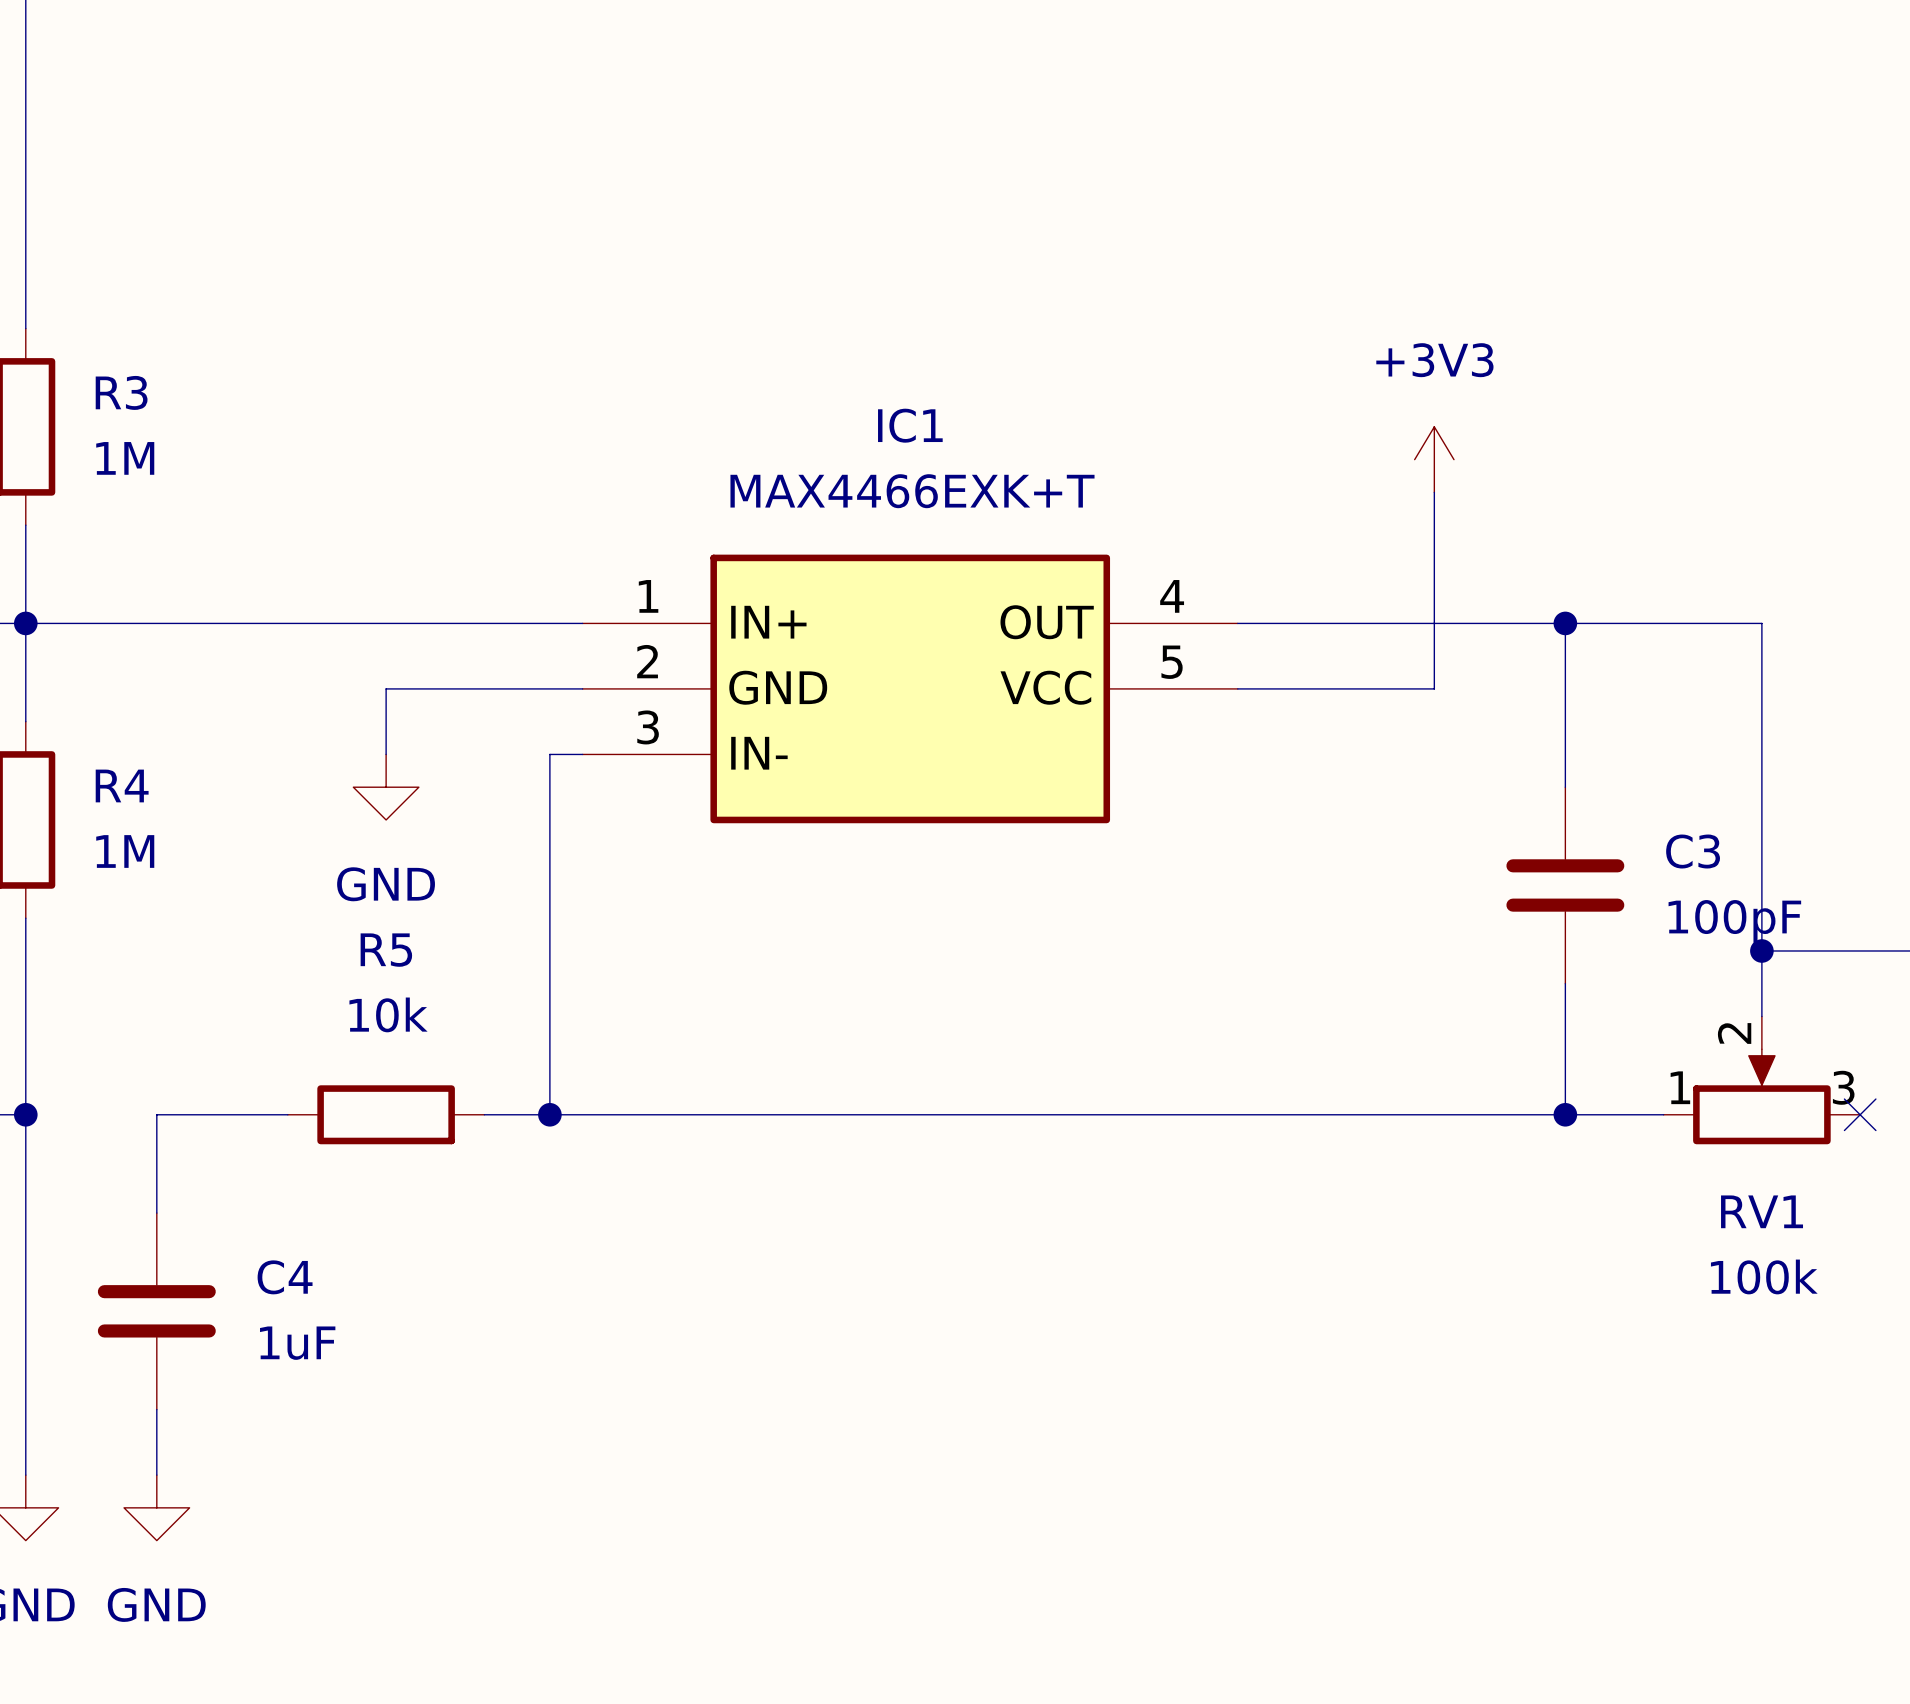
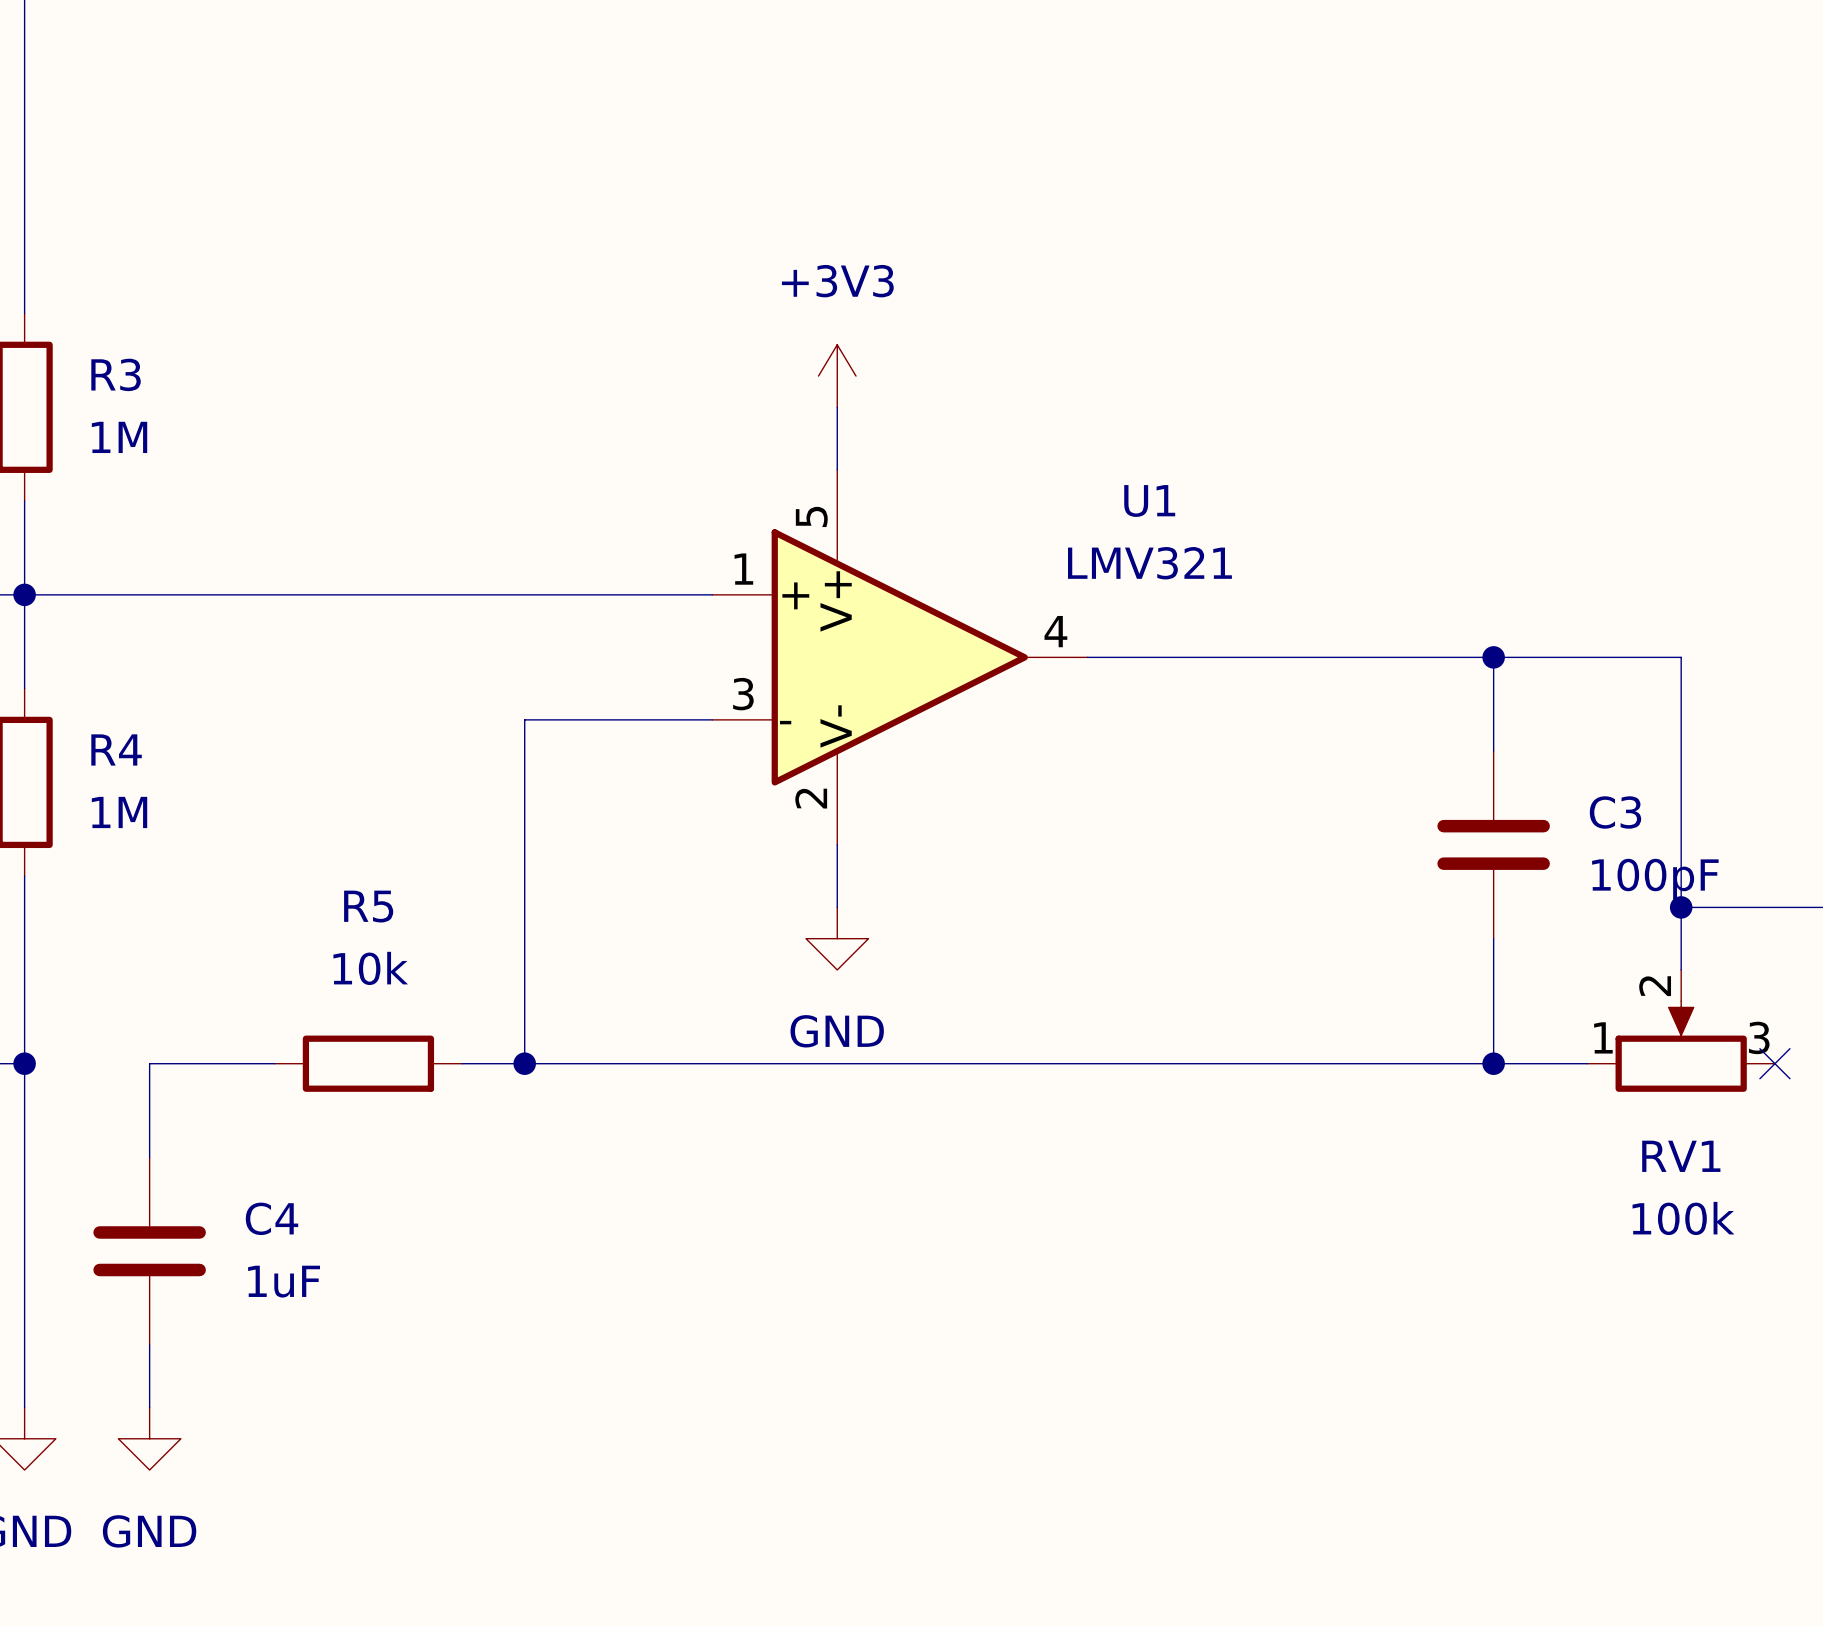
wire: none -> (837, 407) (837, 469)
power symbol position: +3V3 (1434, 459) -> +3V3 (837, 376)
wire: (1434, 492) (1434, 688) -> none
wire: (1237, 623) (1761, 623) (1761, 688) -> (1368, 657) (1681, 657)
wire: (1565, 623) (1565, 688) -> none
junction position: (1565, 623) -> (1493, 657)
wire: (582, 688) (386, 688) (386, 754) -> none
IC1: MAX4466EXK+T (910, 688) -> none
U1: none -> LMV321 (899, 657)
power symbol position: GND (386, 787) -> GND (837, 938)
wire: none -> (837, 844) (837, 907)

